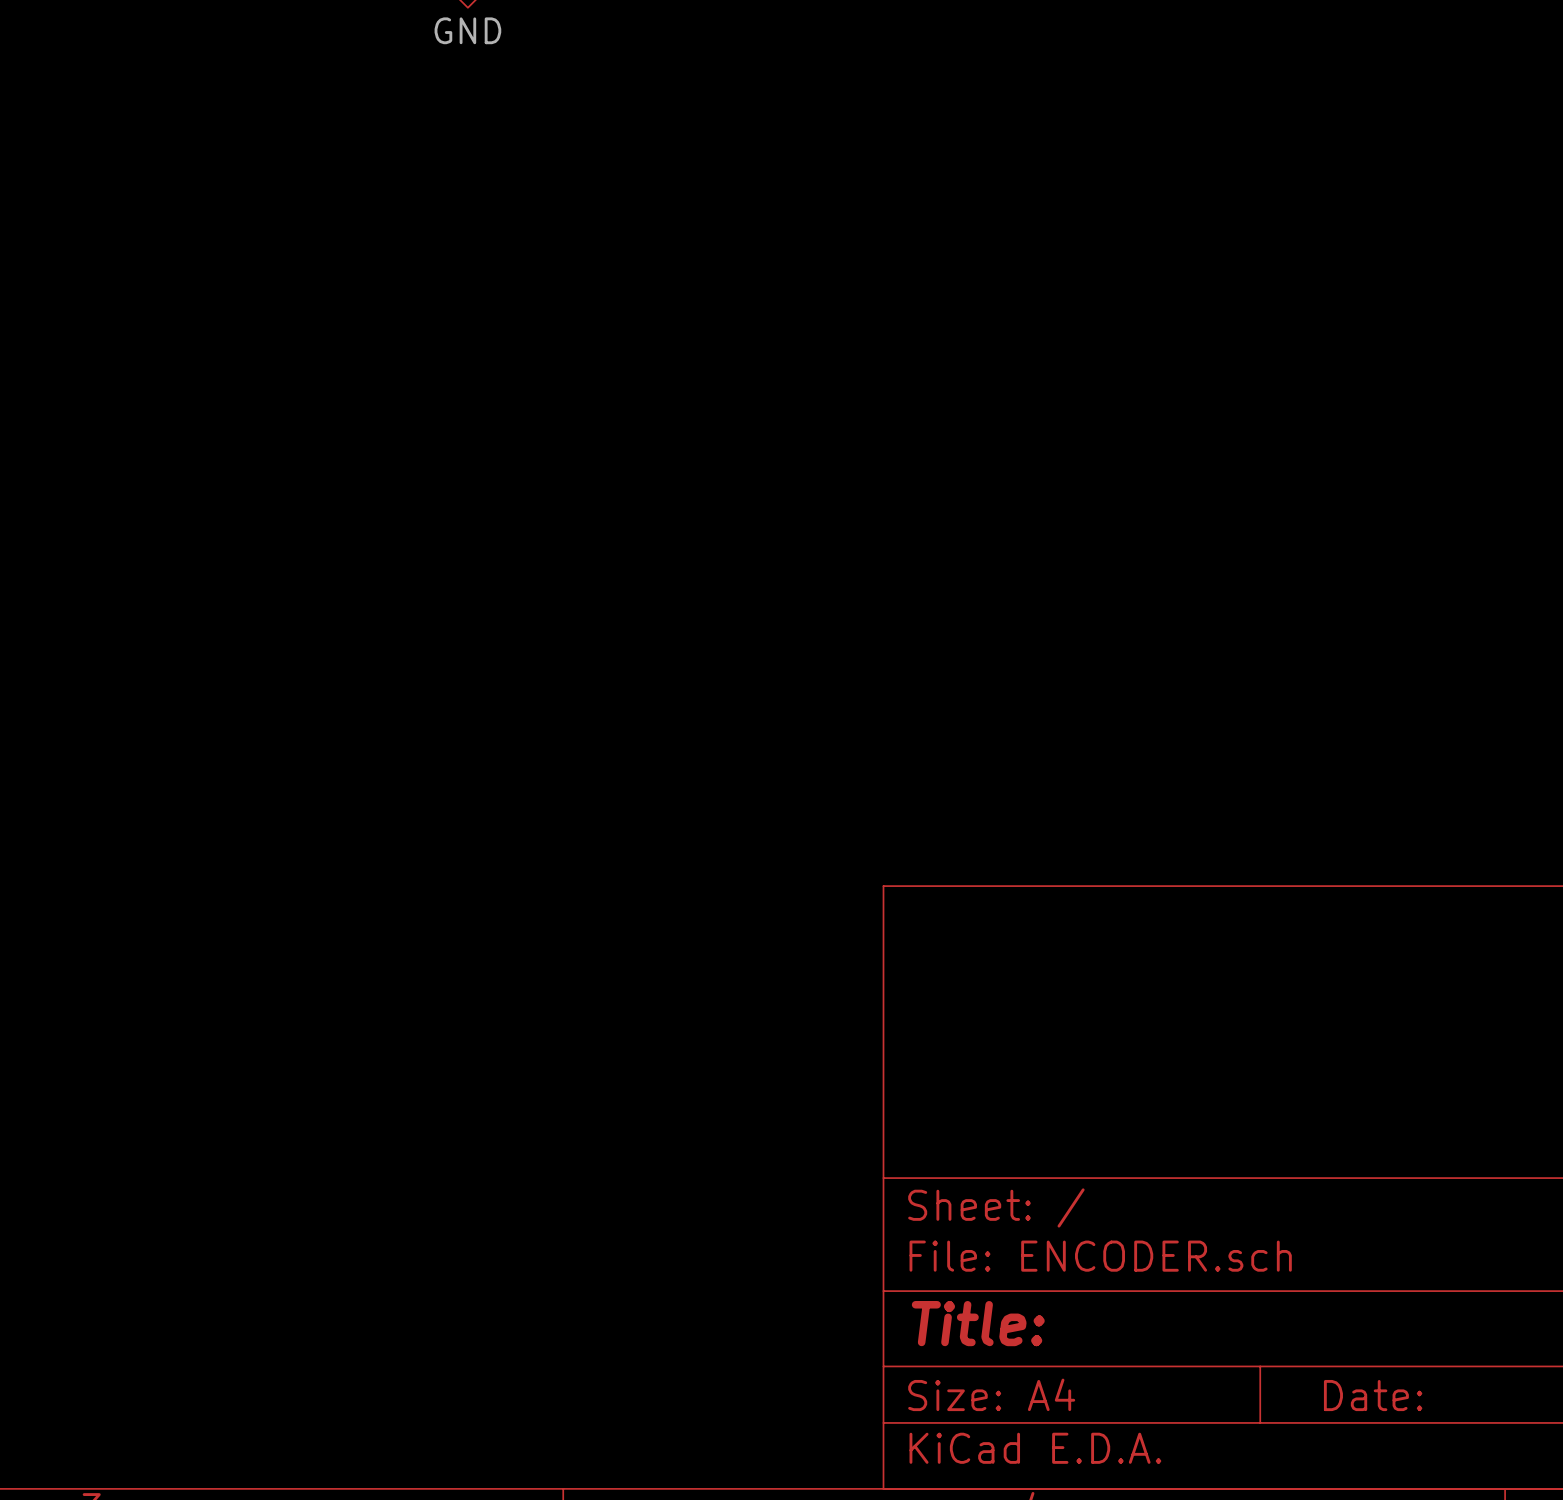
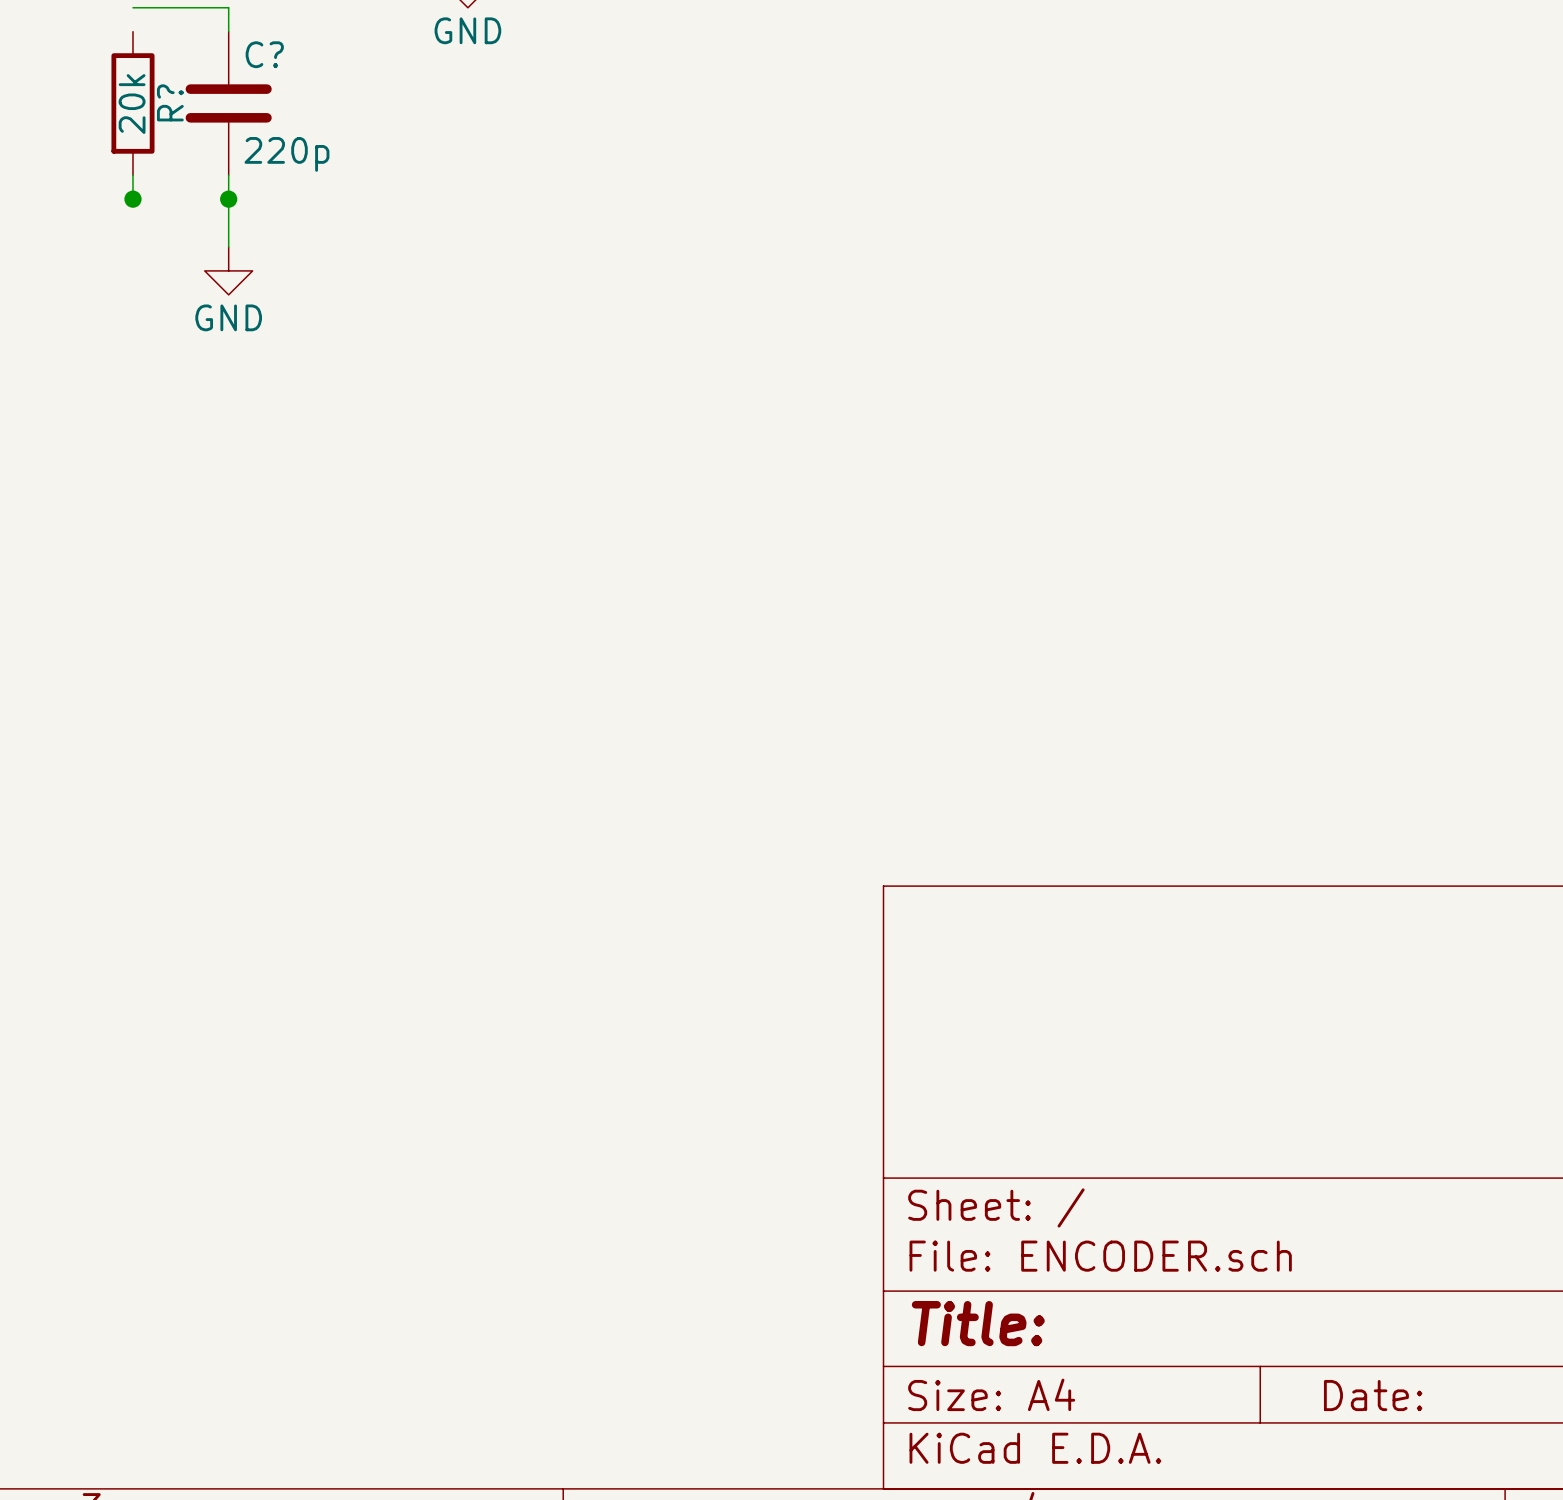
wire: none -> (132, 7) (228, 7) (228, 31)
R?: none -> 20k (132, 103)
C?: none -> 220p (228, 103)
wire: none -> (132, 175) (132, 199)
wire: none -> (228, 175) (228, 247)
junction: none -> (132, 199)
junction: none -> (228, 199)
power symbol: none -> GND (228, 270)

